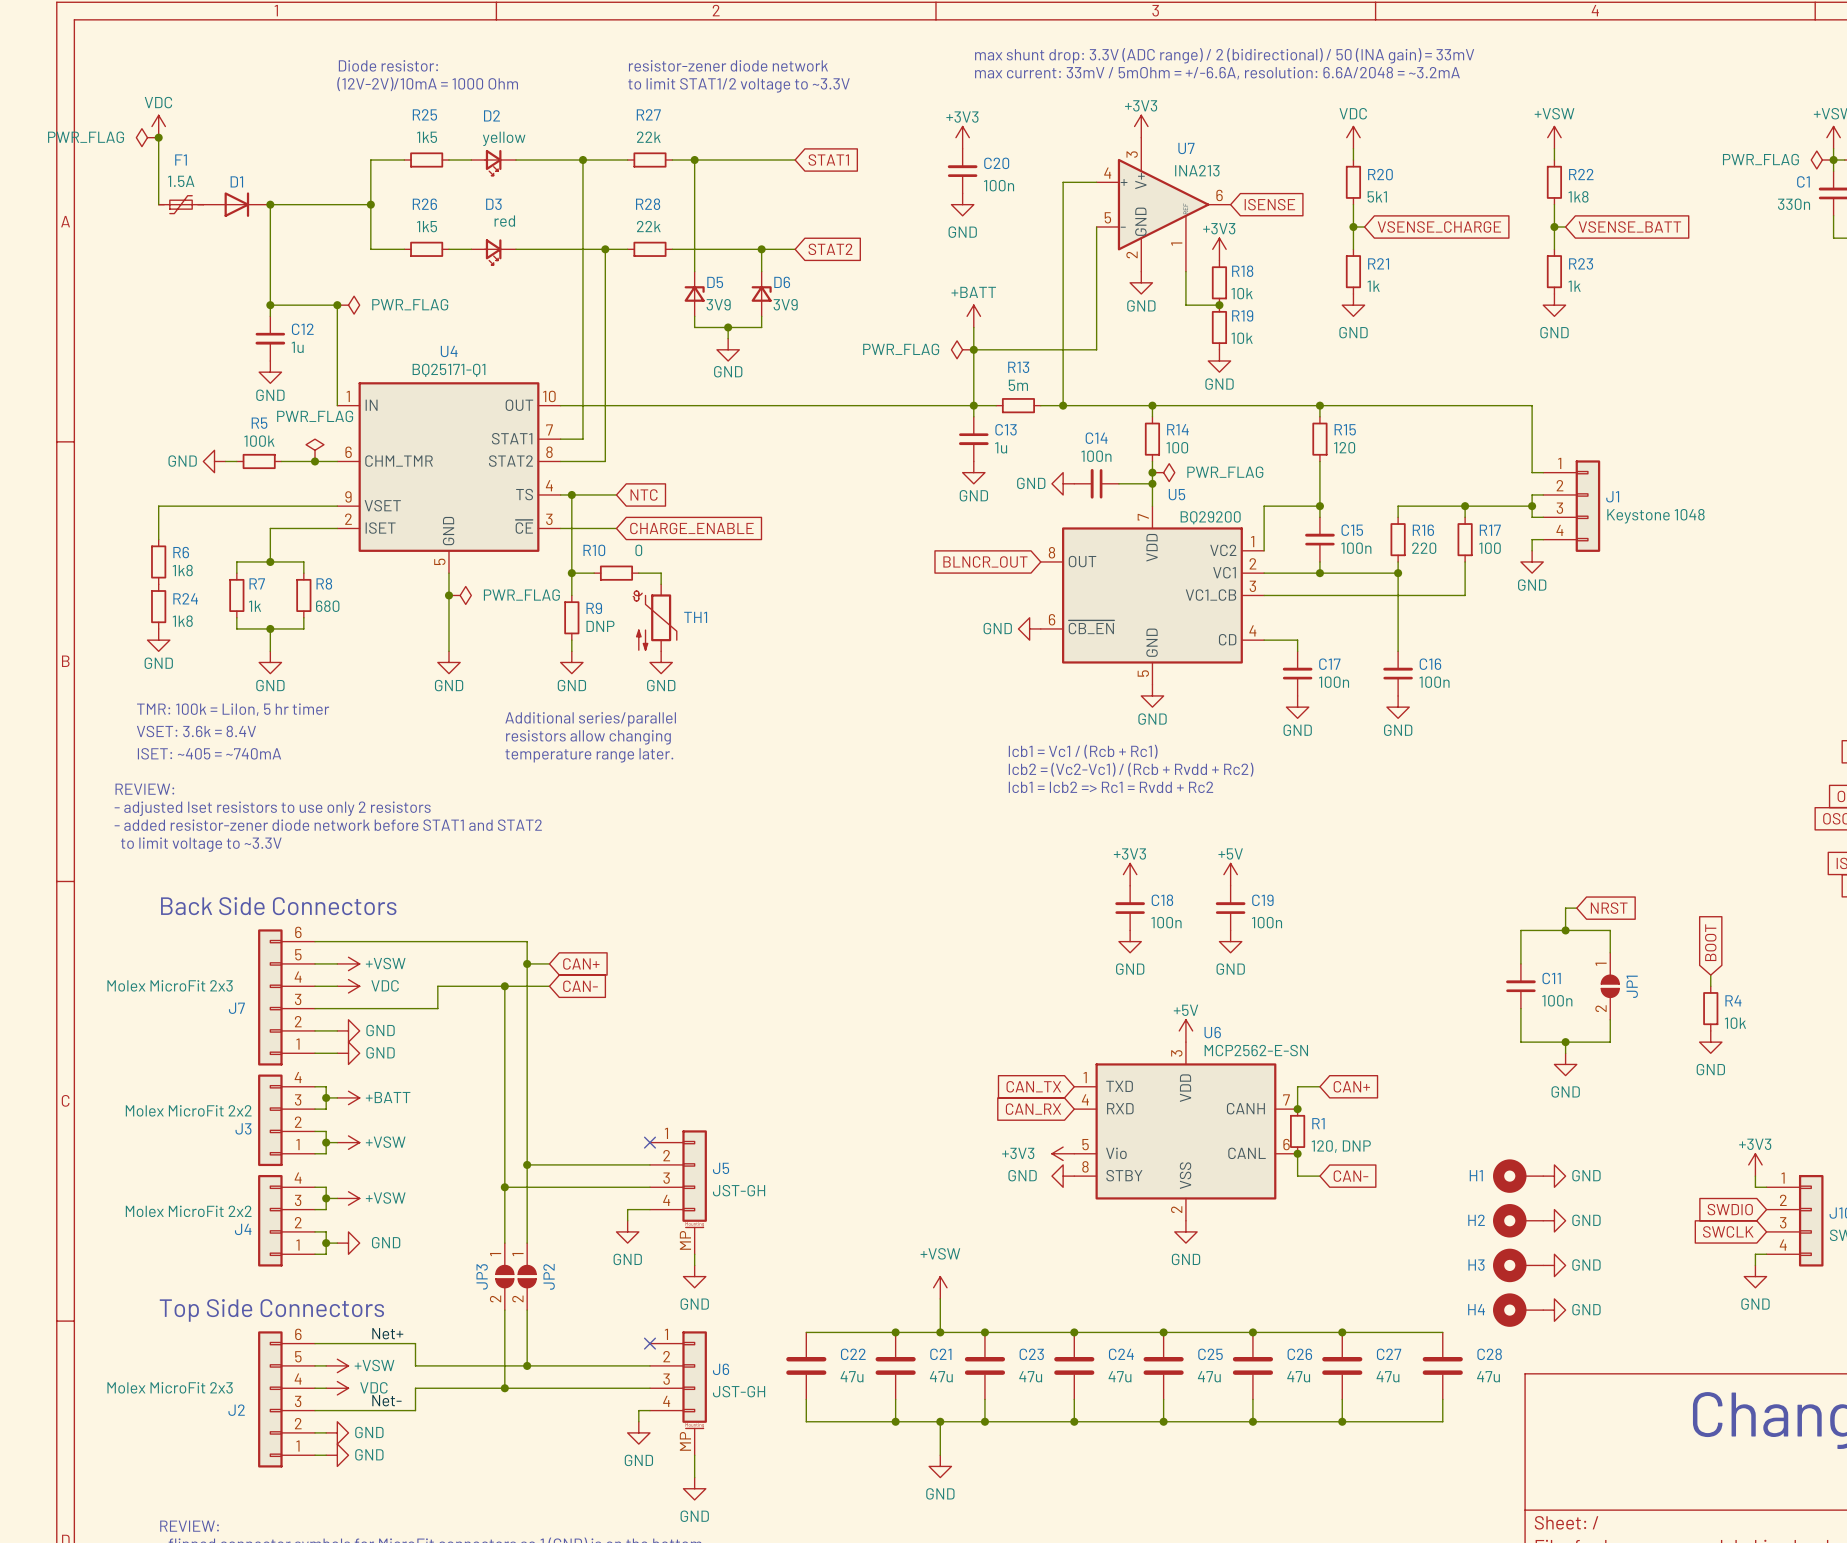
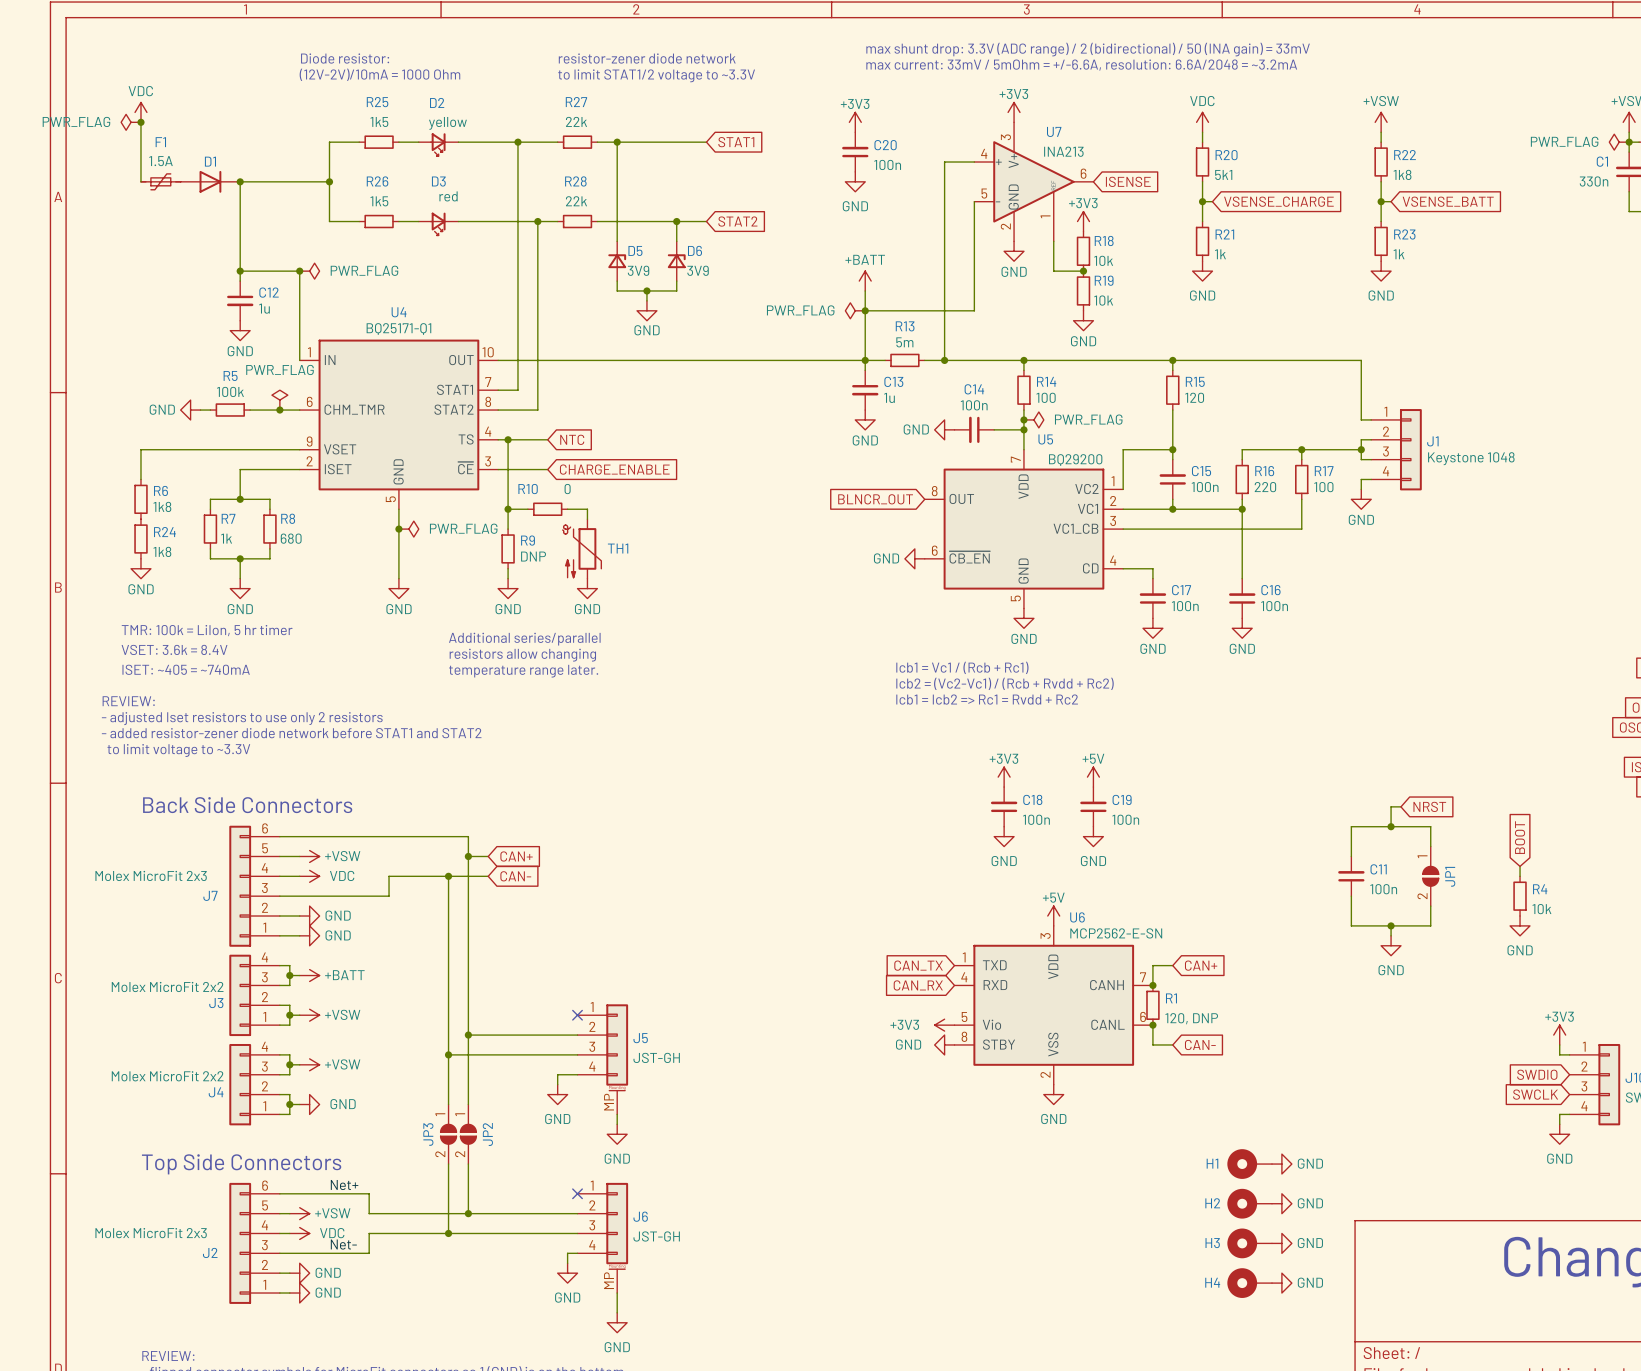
H1 position: (1518, 1176) -> (1249, 1164)
power symbol: GND (1554, 1176) -> none
H2 position: (1518, 1220) -> (1249, 1203)
power symbol: GND (1554, 1220) -> none
H3 position: (1518, 1265) -> (1249, 1243)
power symbol: GND (1554, 1265) -> none
power symbol: +VSW (940, 1287) -> none
wire: (940, 1298) (940, 1332) -> none
power symbol: none -> GND (1281, 1164)
H4 position: (1518, 1310) -> (1249, 1283)
power symbol: GND (1554, 1310) -> none
wire: (806, 1332) (1442, 1332) -> none
junction: (895, 1332) -> none
junction: (940, 1332) -> none
junction: (984, 1332) -> none
junction: (1074, 1332) -> none
junction: (1163, 1332) -> none
junction: (1252, 1332) -> none
junction: (1342, 1332) -> none
power symbol: none -> GND (1281, 1203)
C22: 47u (806, 1365) -> none
C21: 47u (895, 1365) -> none
C23: 47u (984, 1365) -> none
C24: 47u (1074, 1365) -> none
C25: 47u (1163, 1365) -> none
C26: 47u (1252, 1365) -> none
C27: 47u (1342, 1365) -> none
C28: 47u (1442, 1365) -> none
wire: (806, 1399) (806, 1421) (1442, 1421) (1442, 1399) -> none
wire: (895, 1399) (895, 1421) -> none
wire: (984, 1399) (984, 1421) -> none
wire: (1074, 1399) (1074, 1421) -> none
wire: (1163, 1399) (1163, 1421) -> none
wire: (1252, 1399) (1252, 1421) -> none
wire: (1342, 1399) (1342, 1421) -> none
power symbol: none -> GND (1281, 1243)
junction: (895, 1421) -> none
wire: (940, 1421) (940, 1455) -> none
junction: (940, 1421) -> none
junction: (984, 1421) -> none
junction: (1074, 1421) -> none
junction: (1163, 1421) -> none
junction: (1252, 1421) -> none
junction: (1342, 1421) -> none
power symbol: none -> GND (1281, 1283)
power symbol: GND (940, 1466) -> none

